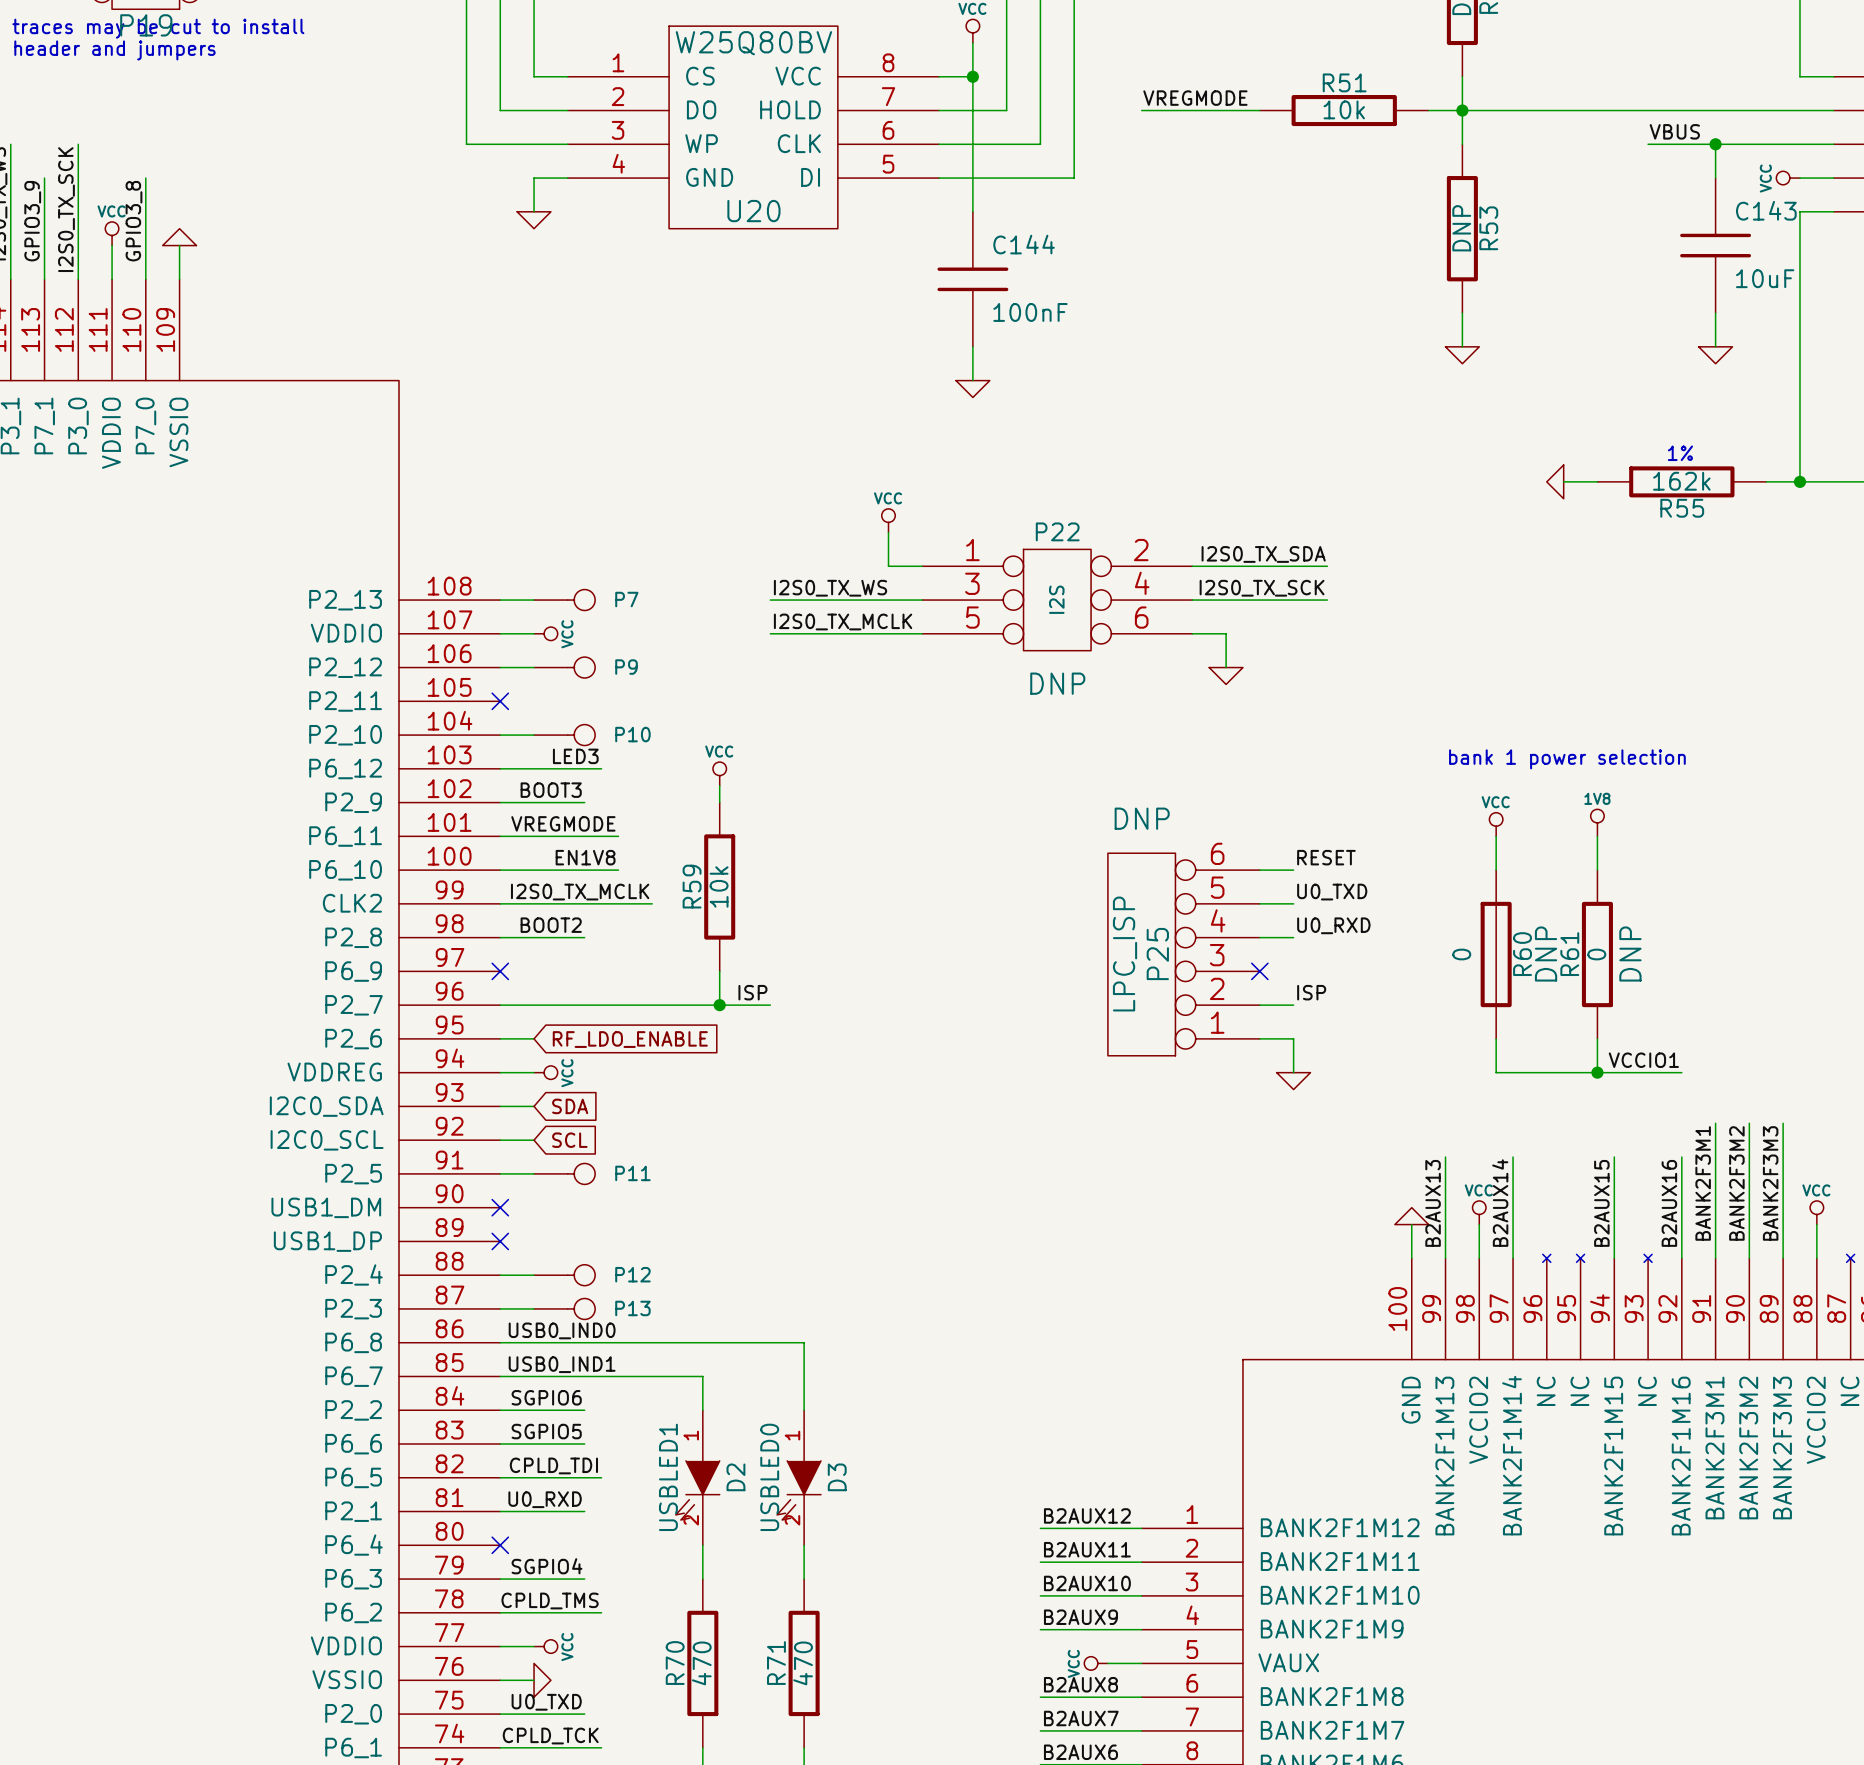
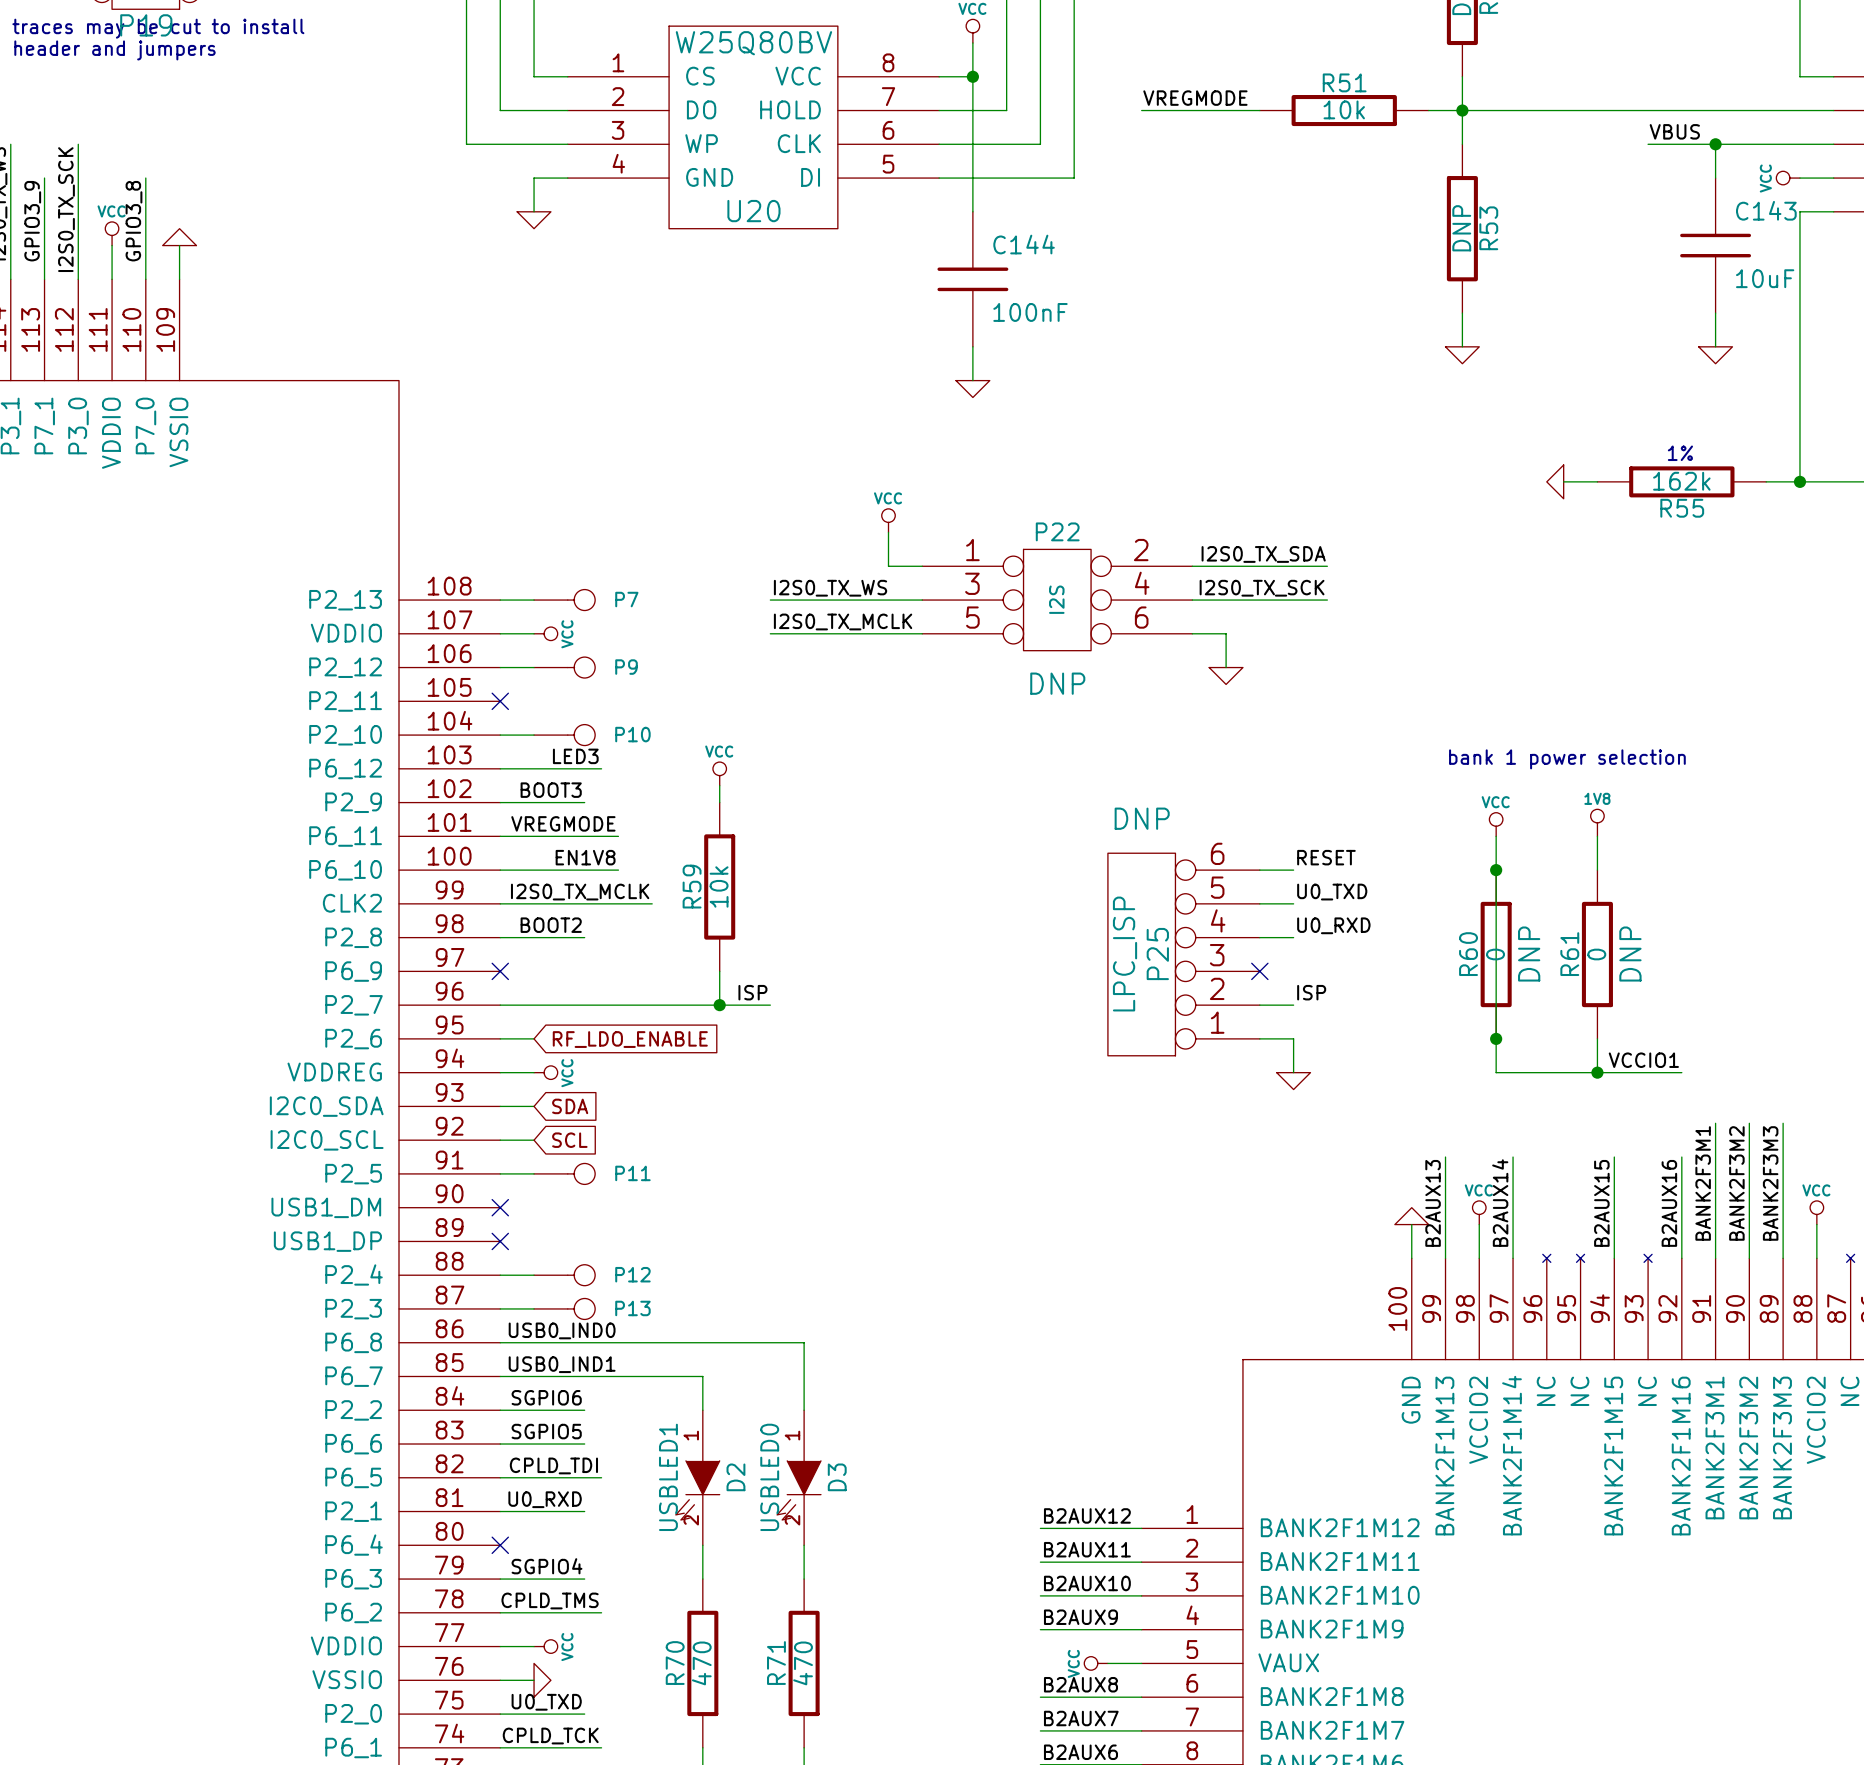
R60 symbol: [1480, 870, 1512, 1039] -> [1480, 870, 1512, 1039]
junction: none -> (1496, 870)
R60 value position: 0 (1461, 954) -> 0 (1495, 954)
R60 name position: R60 (1522, 954) -> R60 (1468, 954)
junction: none -> (1496, 1038)

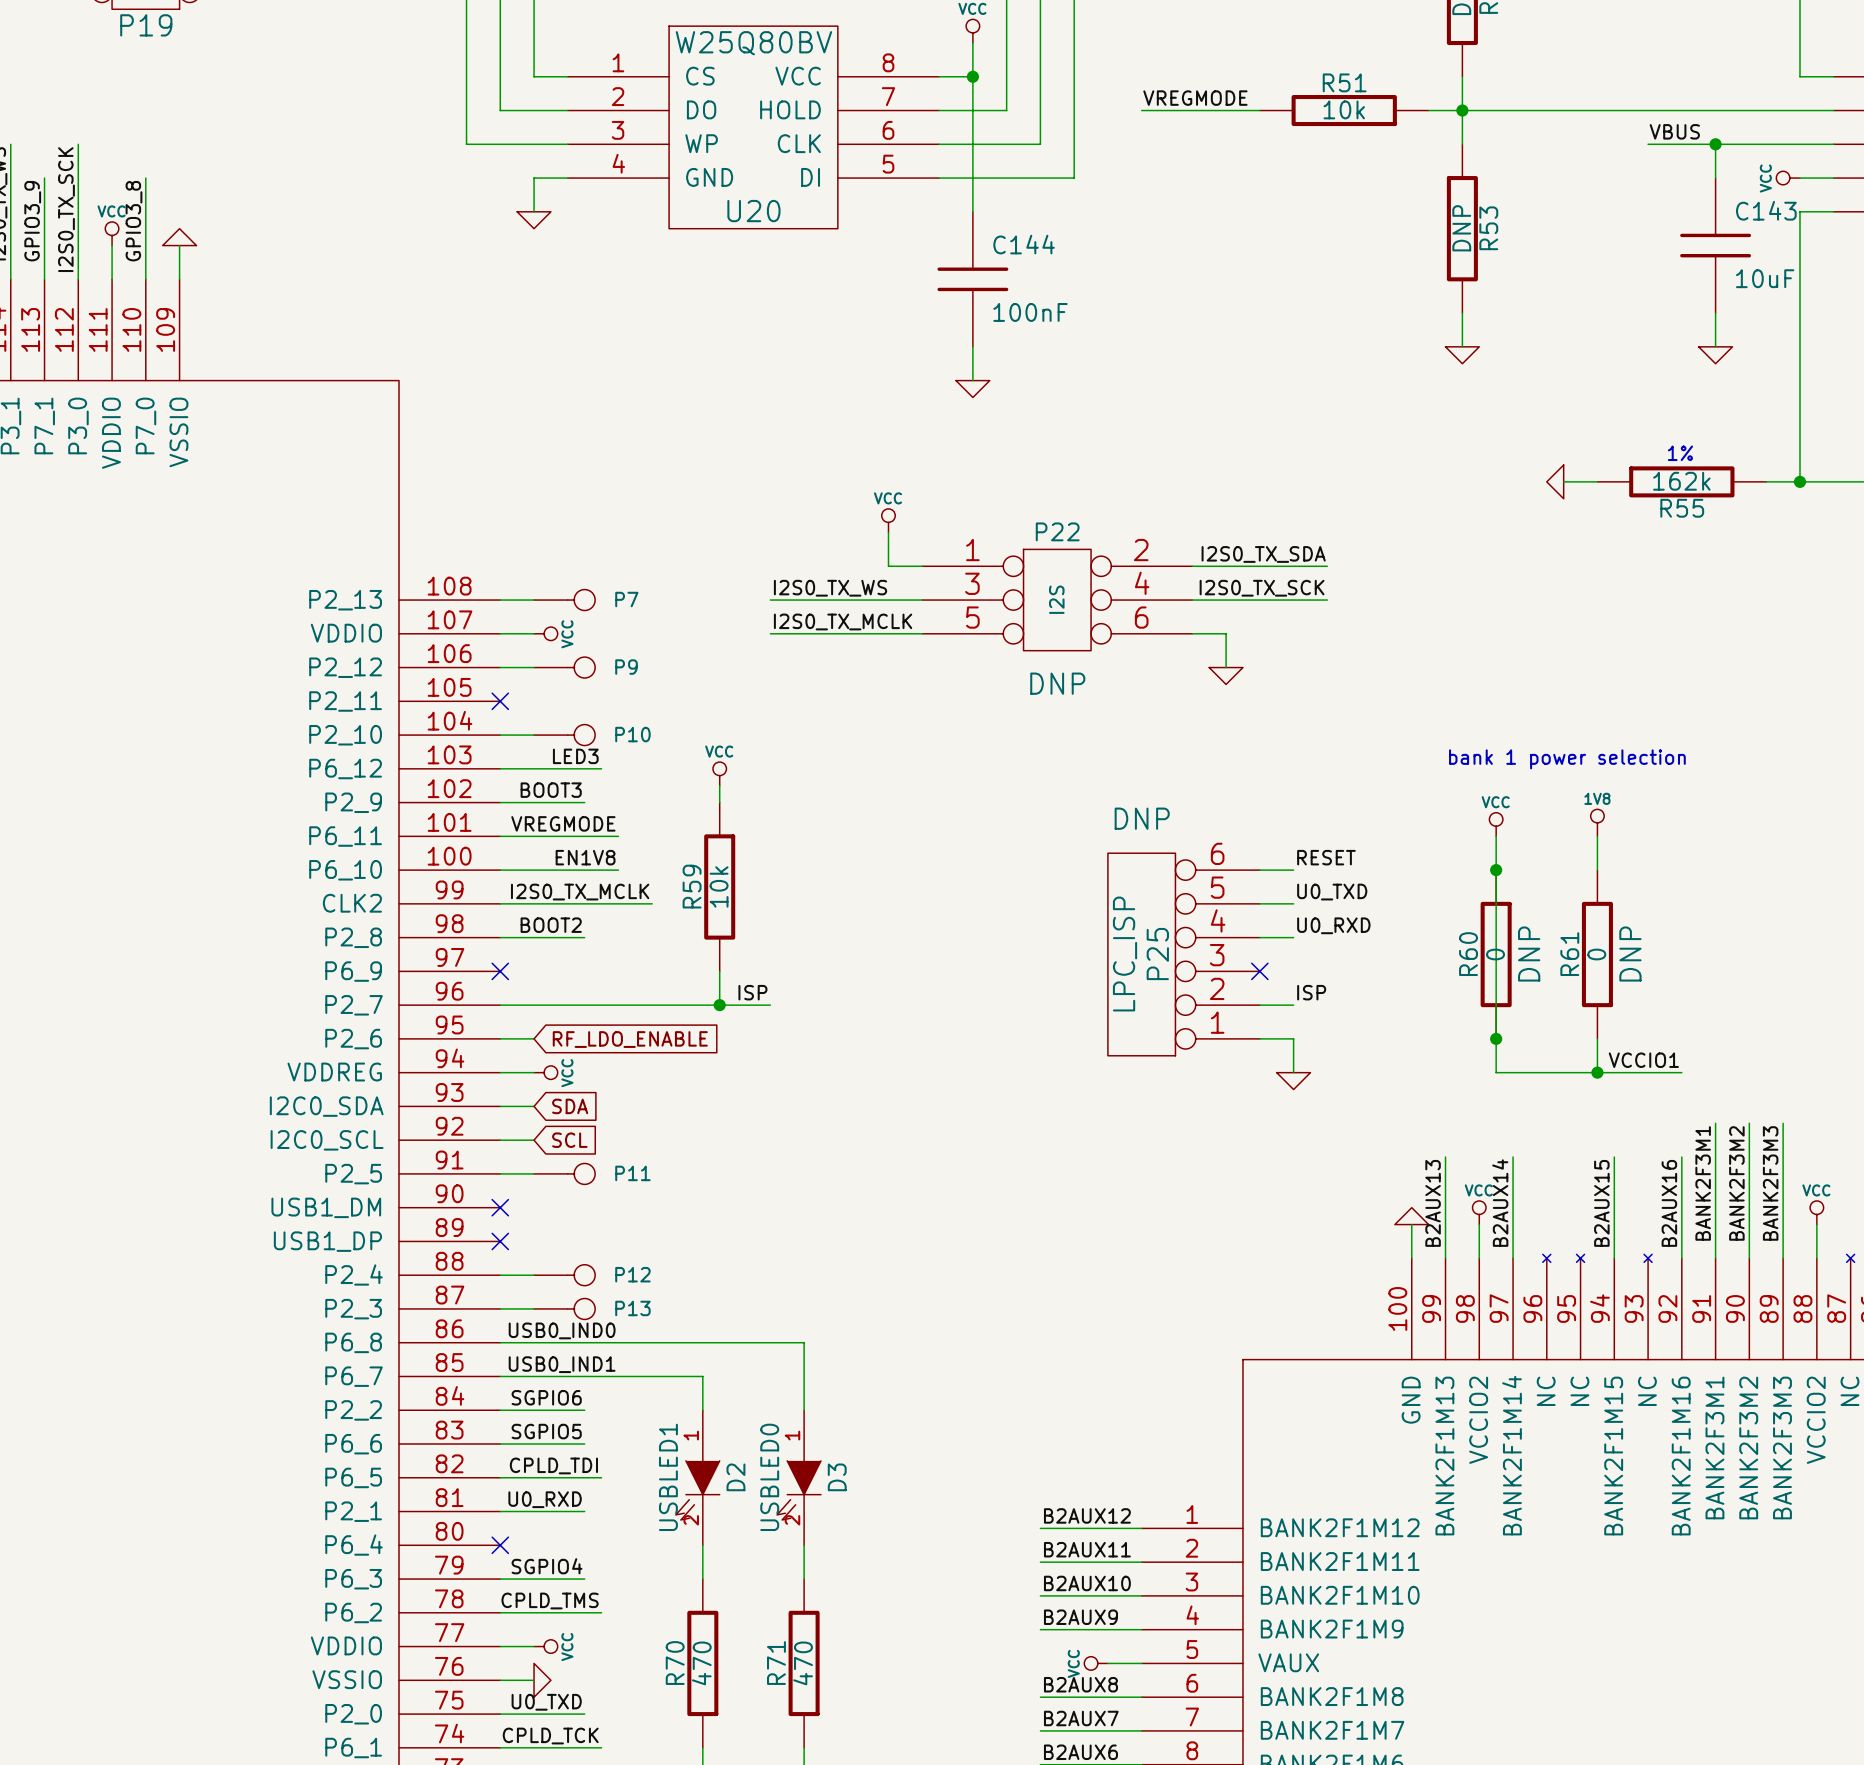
text: traces may be cut to install (158, 28) -> none
text: header and jumpers (114, 50) -> none

